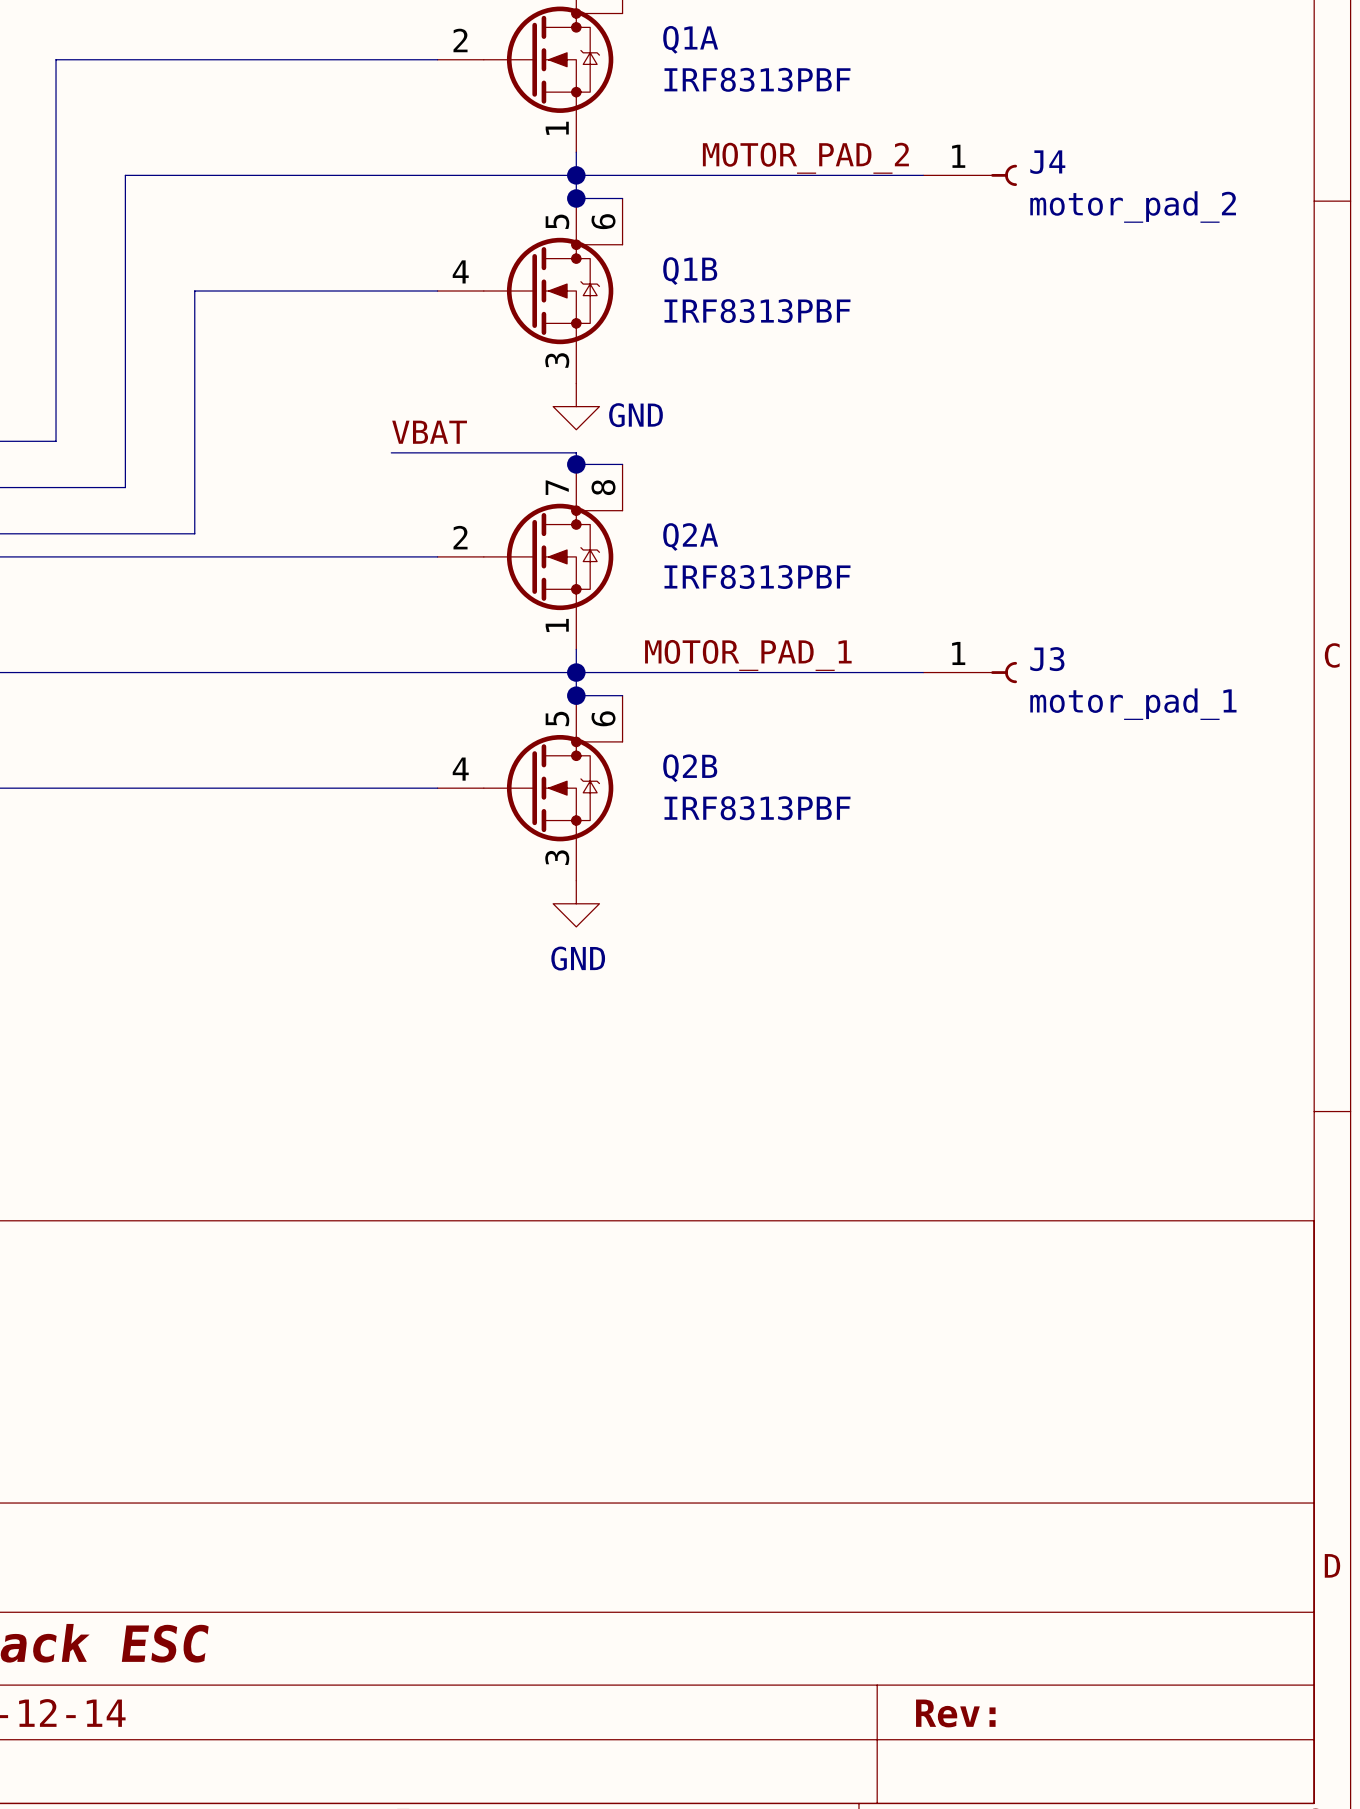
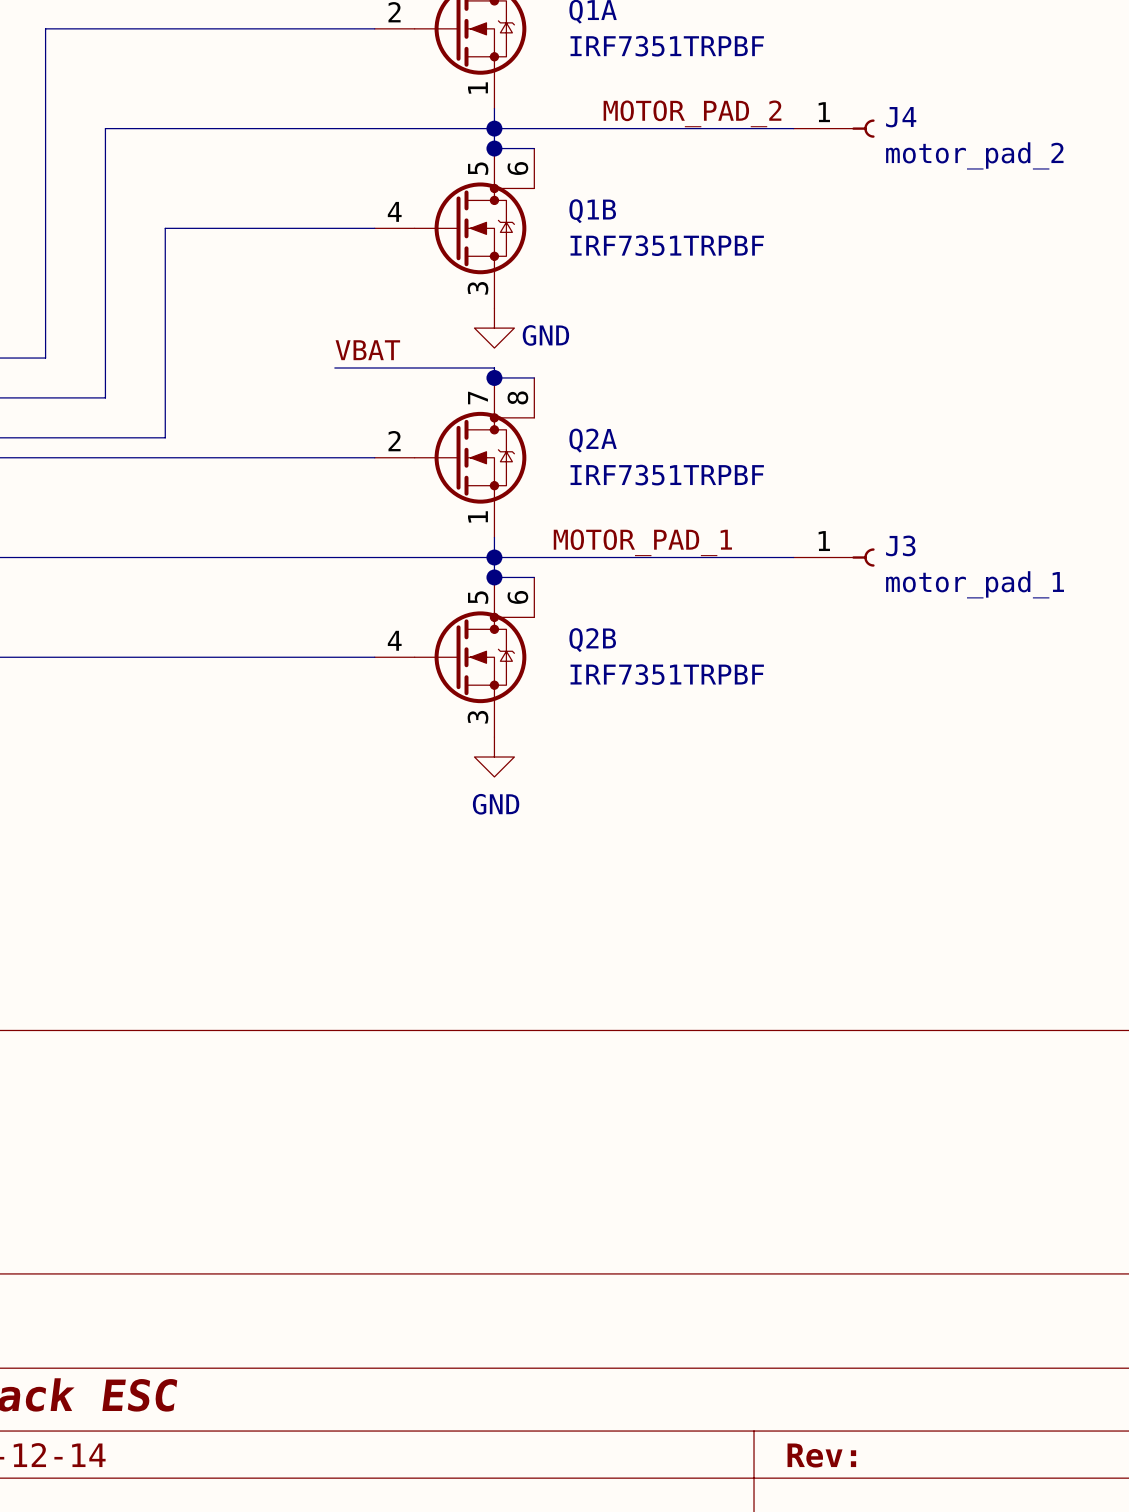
Q1A value: IRF8313PBF (757, 79) -> IRF7351TRPBF (667, 46)
Q1B value: IRF8313PBF (757, 311) -> IRF7351TRPBF (667, 245)
Q2A value: IRF8313PBF (757, 577) -> IRF7351TRPBF (667, 475)
Q2B value: IRF8313PBF (757, 808) -> IRF7351TRPBF (667, 674)

